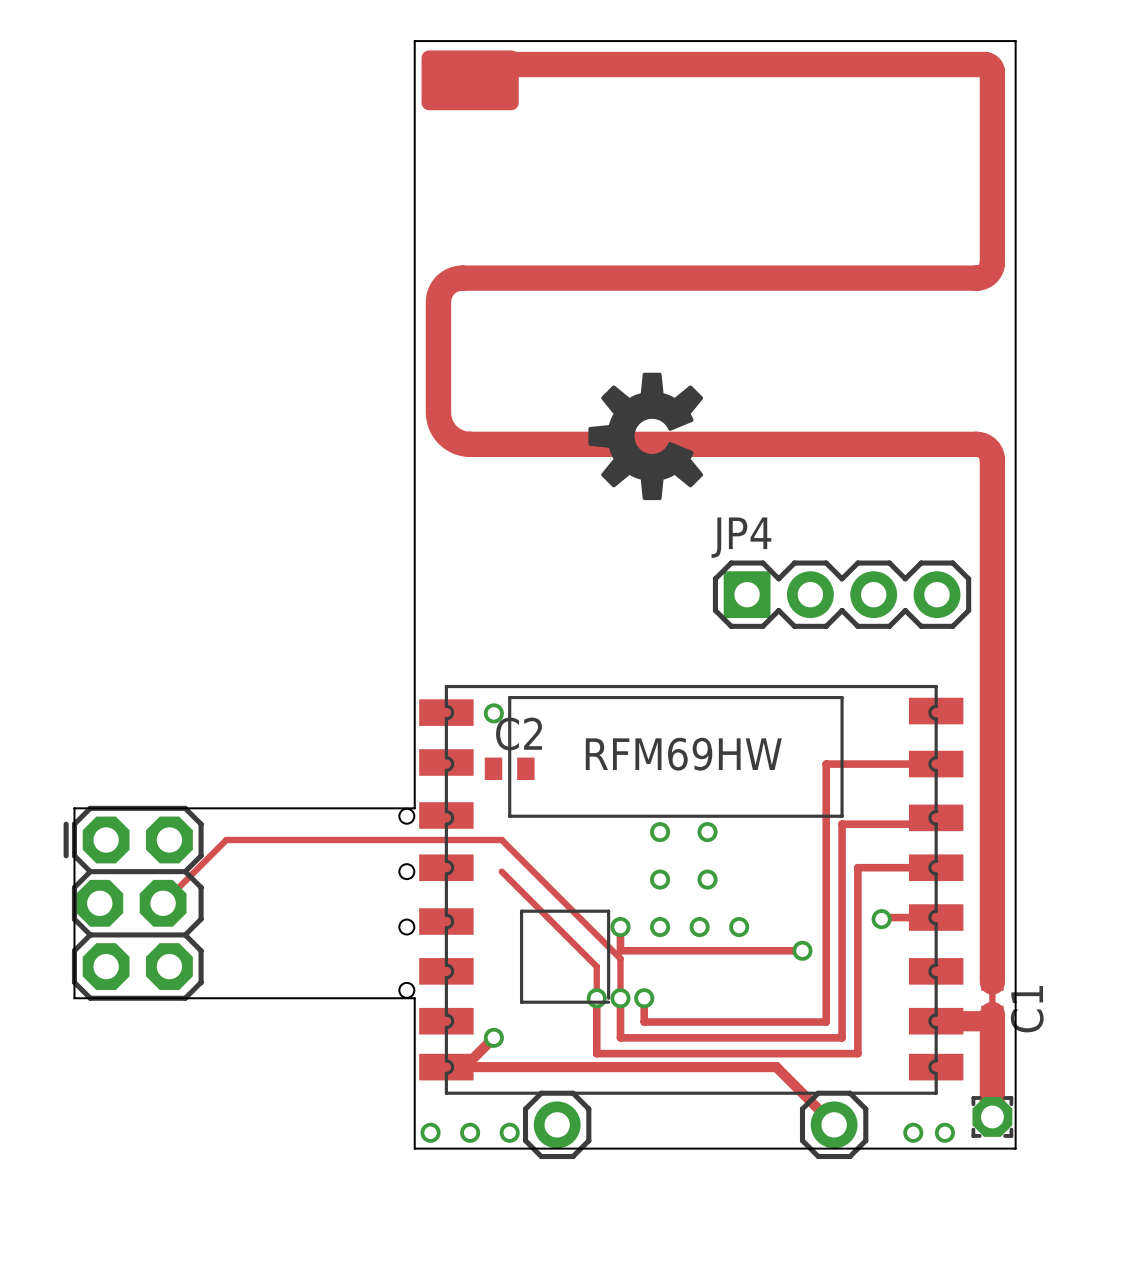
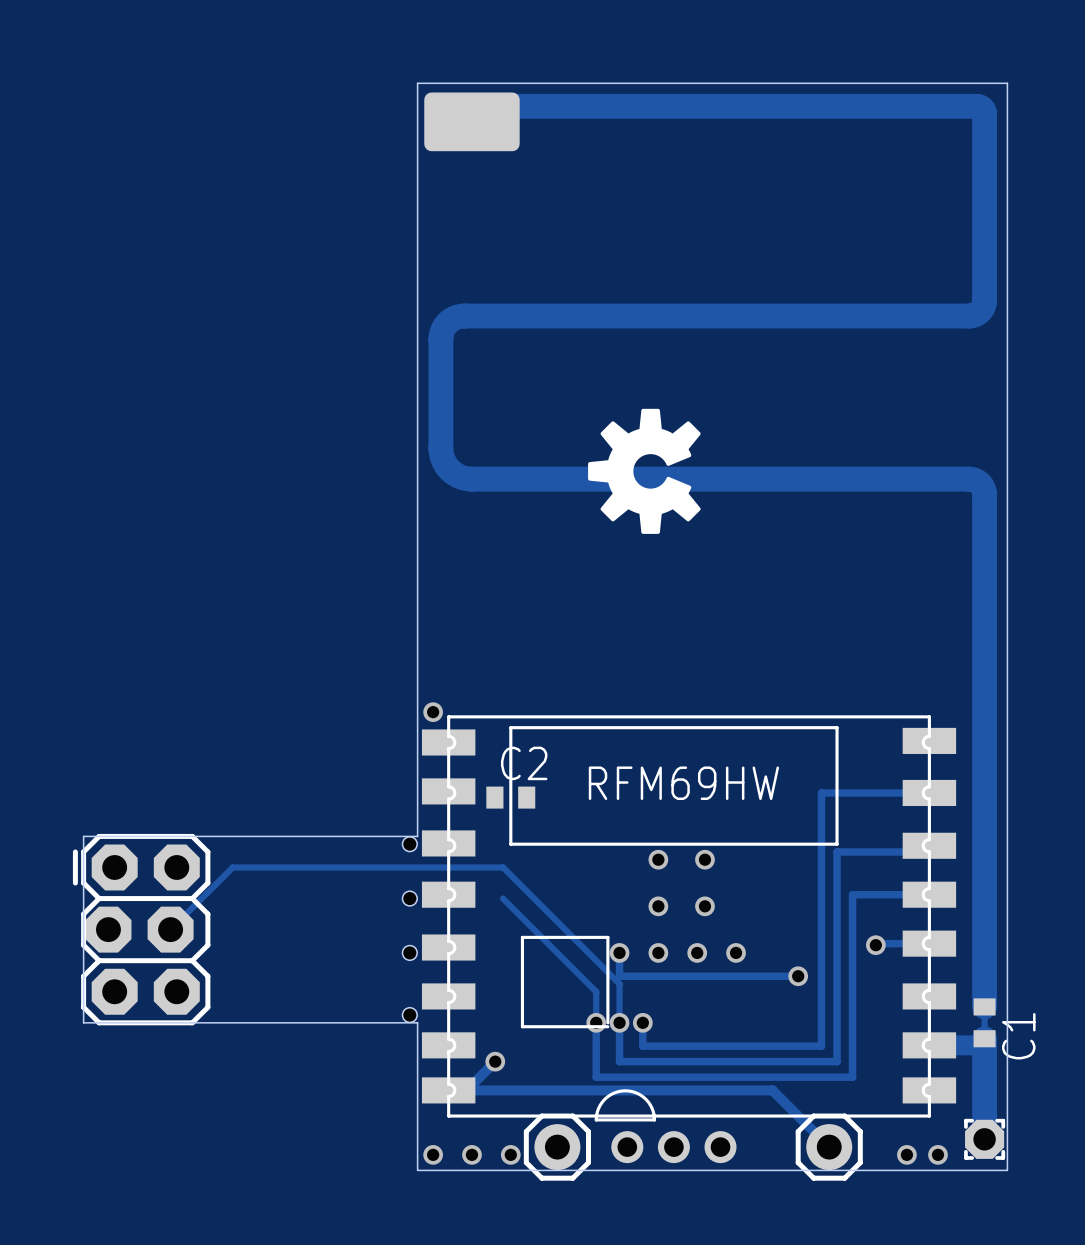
JP4: (842, 594) -> none
via position: (493, 713) -> (433, 712)
part: none -> (665, 1126)

